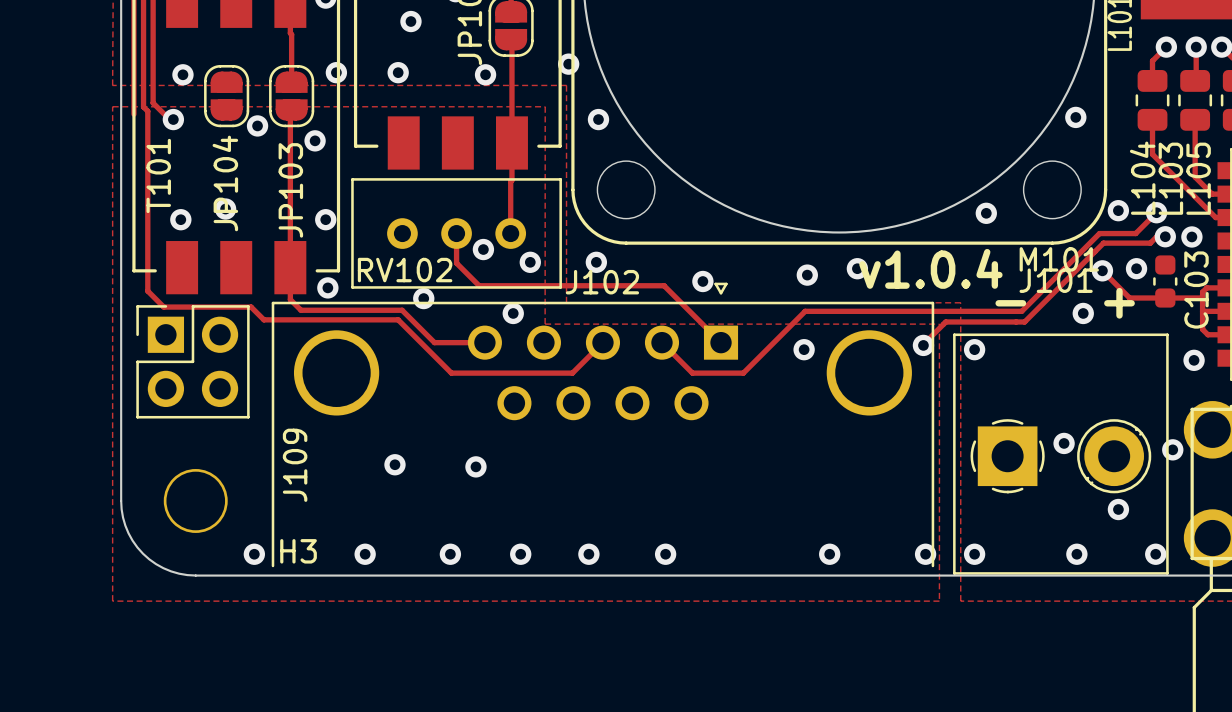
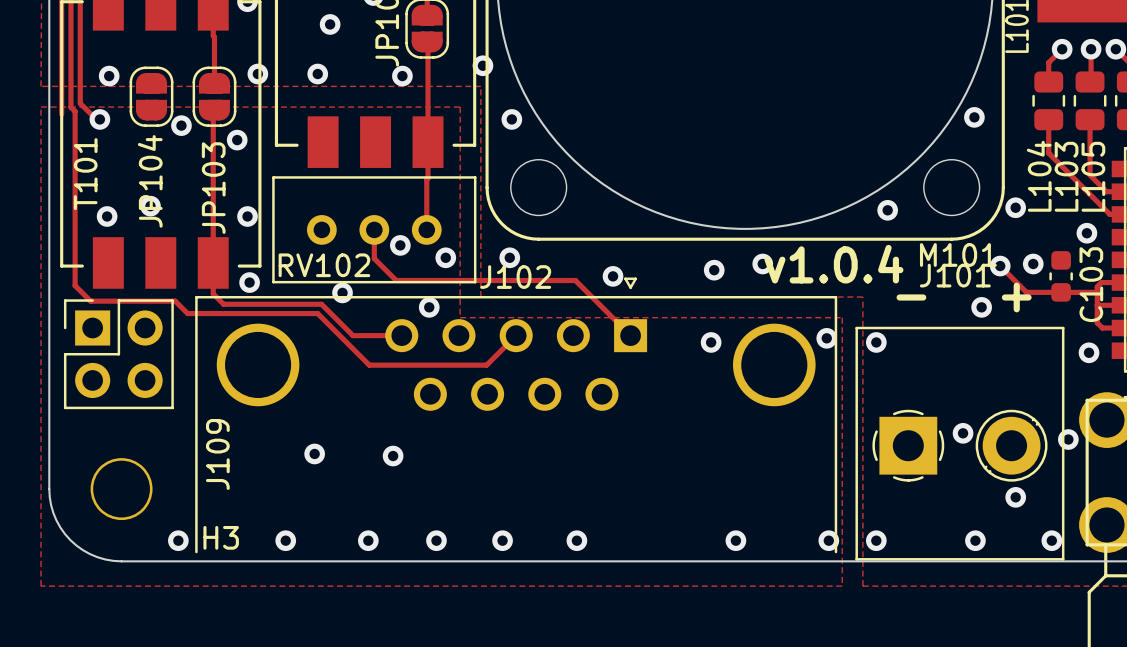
track: (1156, 212) (1135, 233) (1099, 233) (1021, 311) (805, 311) (743, 373) (692, 373) (661, 342) -> none
via: (1156, 212) -> none
track: (1165, 236) (1156, 236) (1150, 243) (1103, 243) (1024, 321) (945, 321) (923, 345) -> none
via: (1165, 236) -> none

